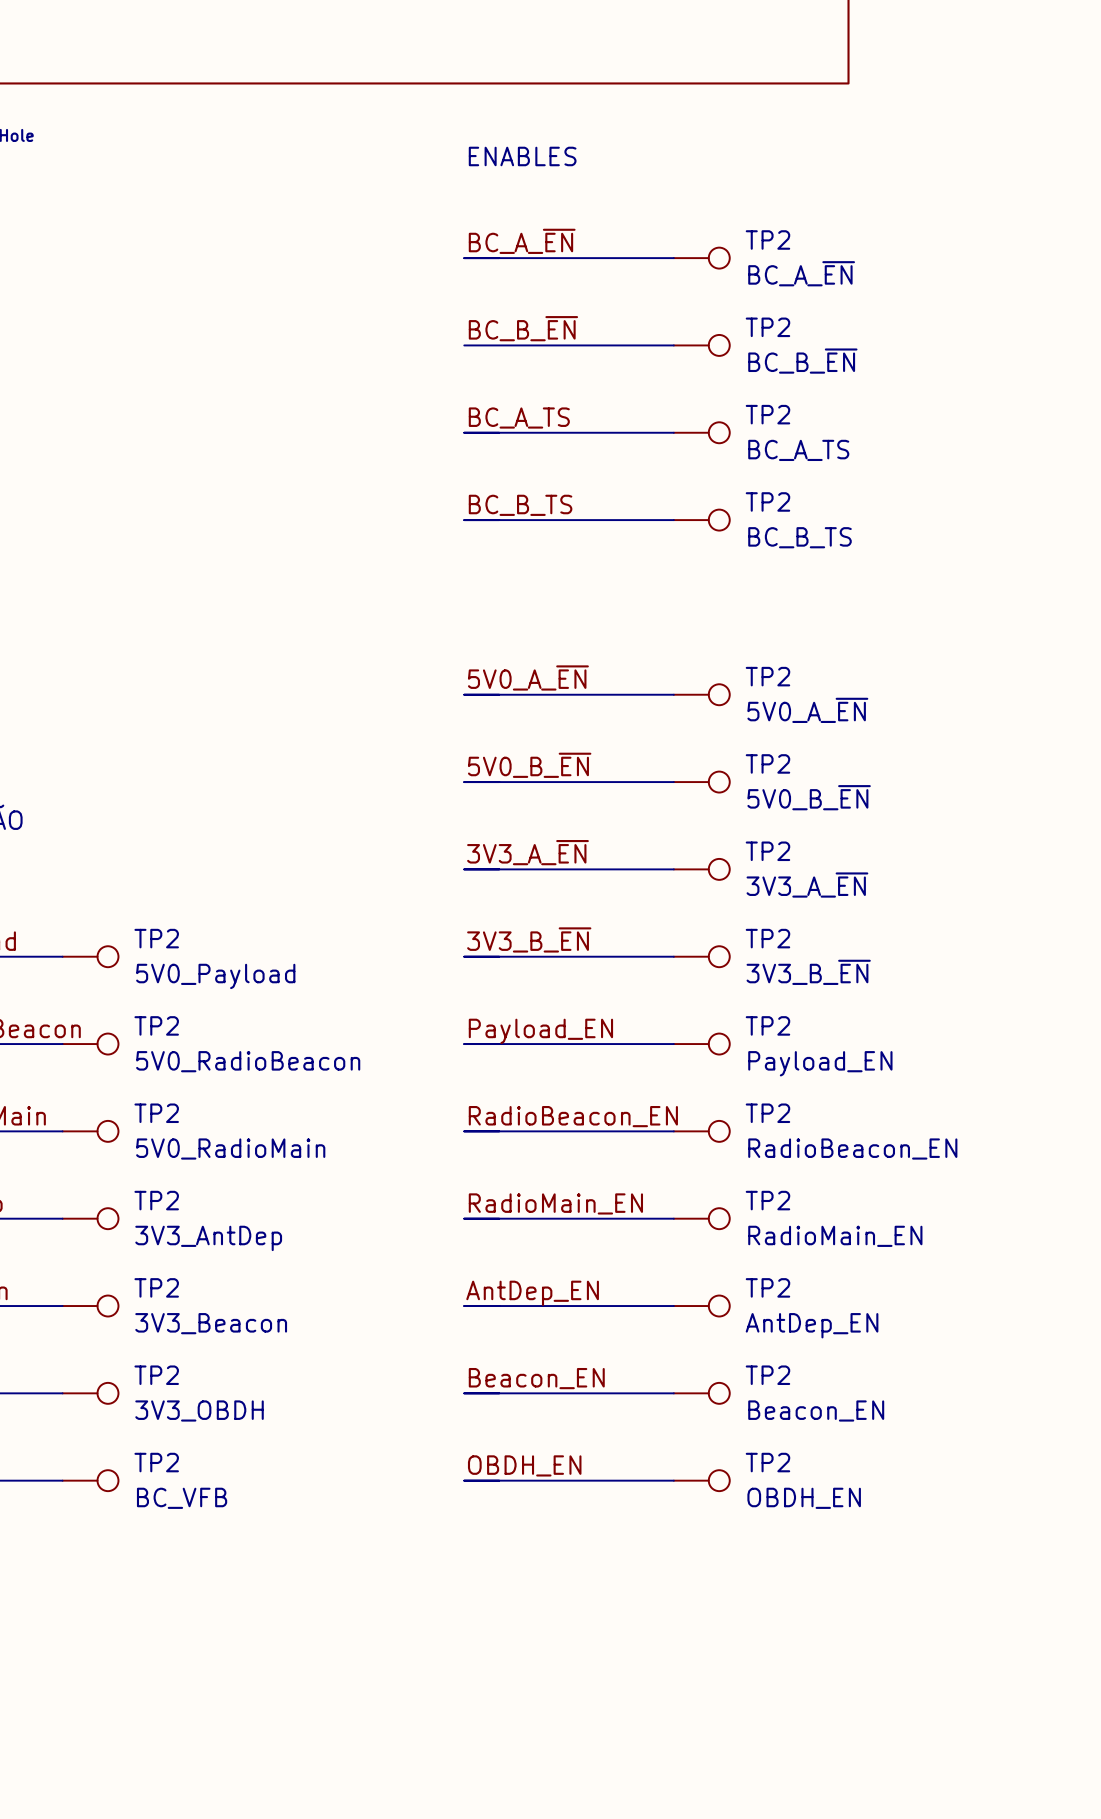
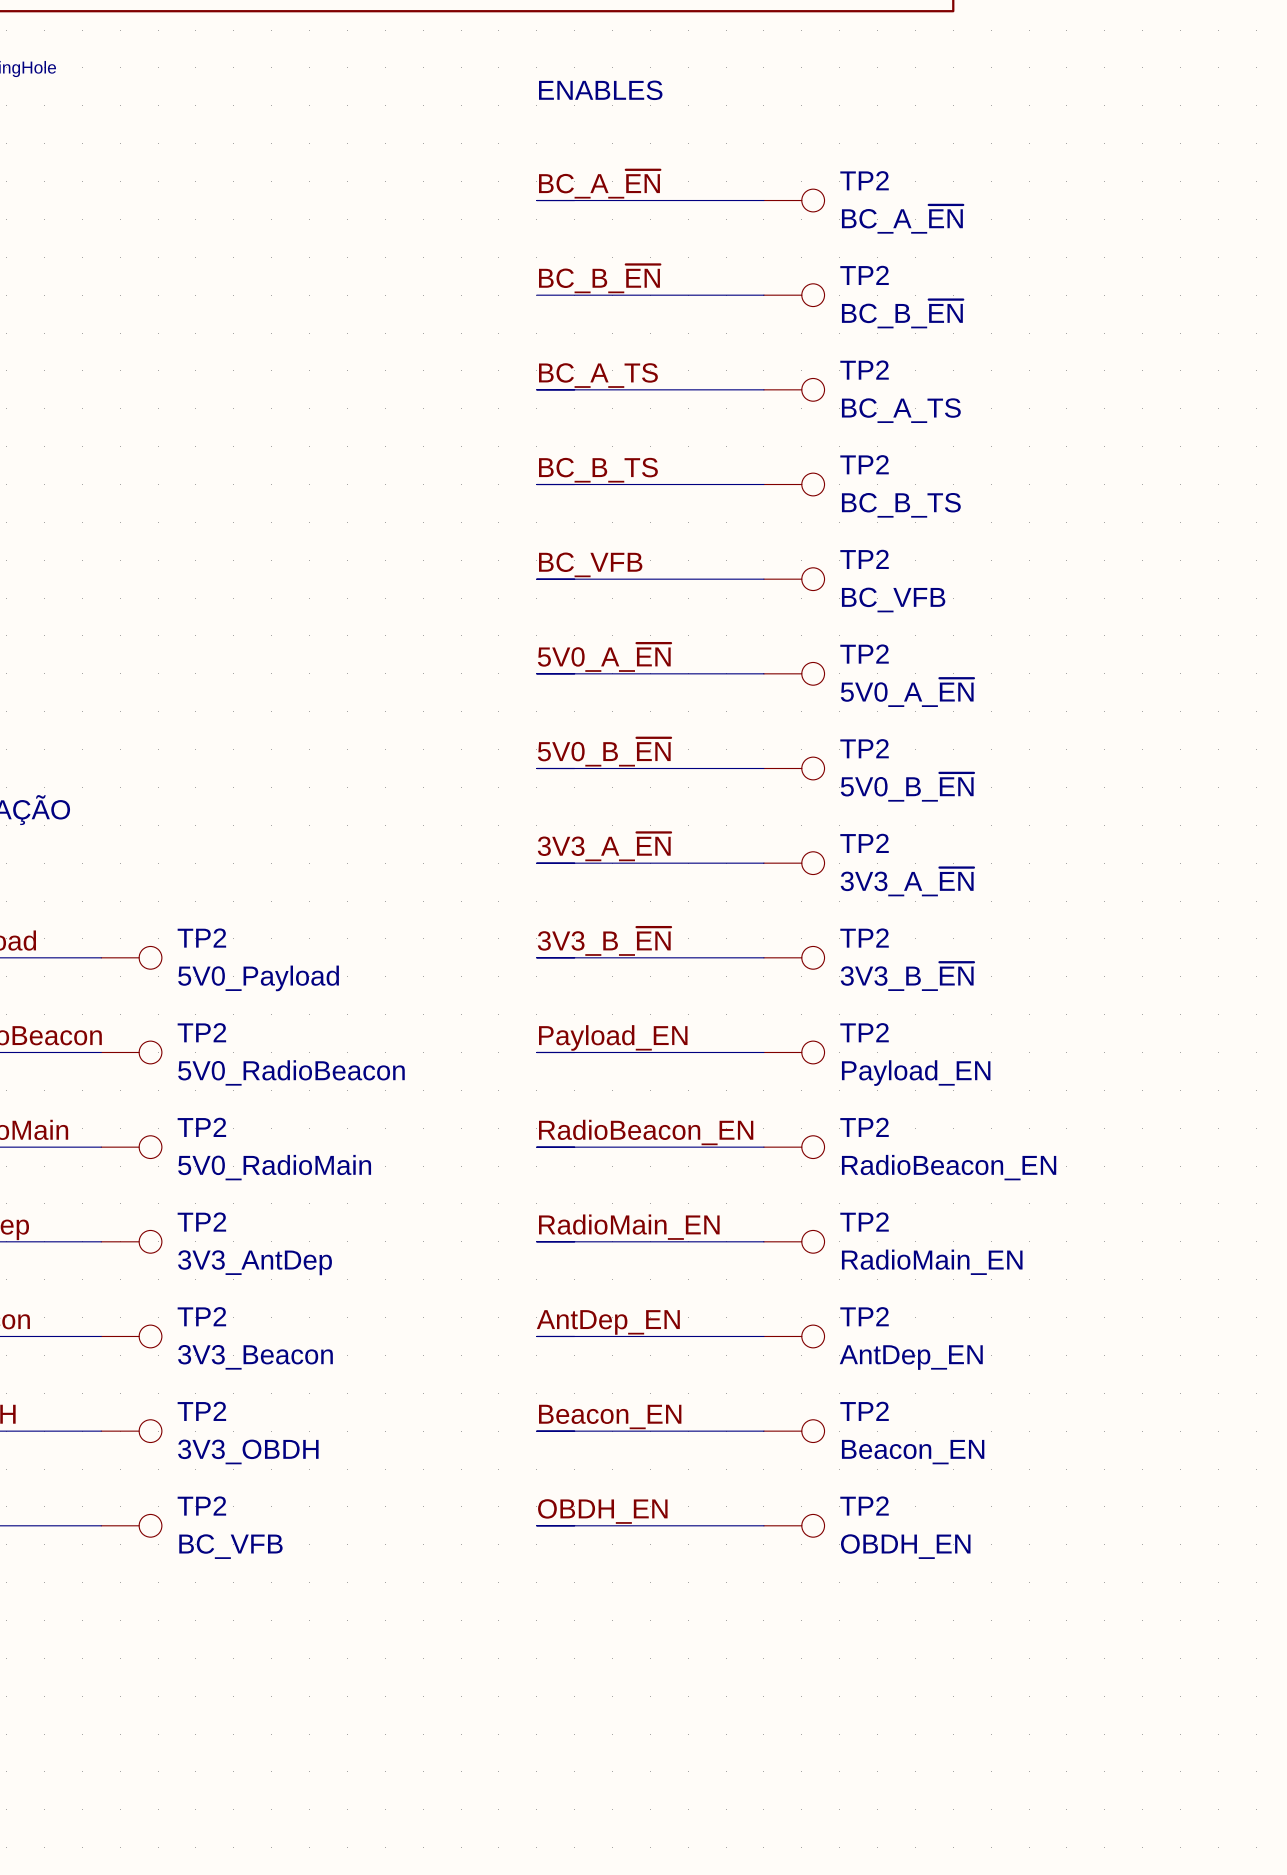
label: none -> BC_VFB (590, 564)
wire: none -> (536, 579) (763, 579)
TP2: none -> BC_VFB (794, 579)

